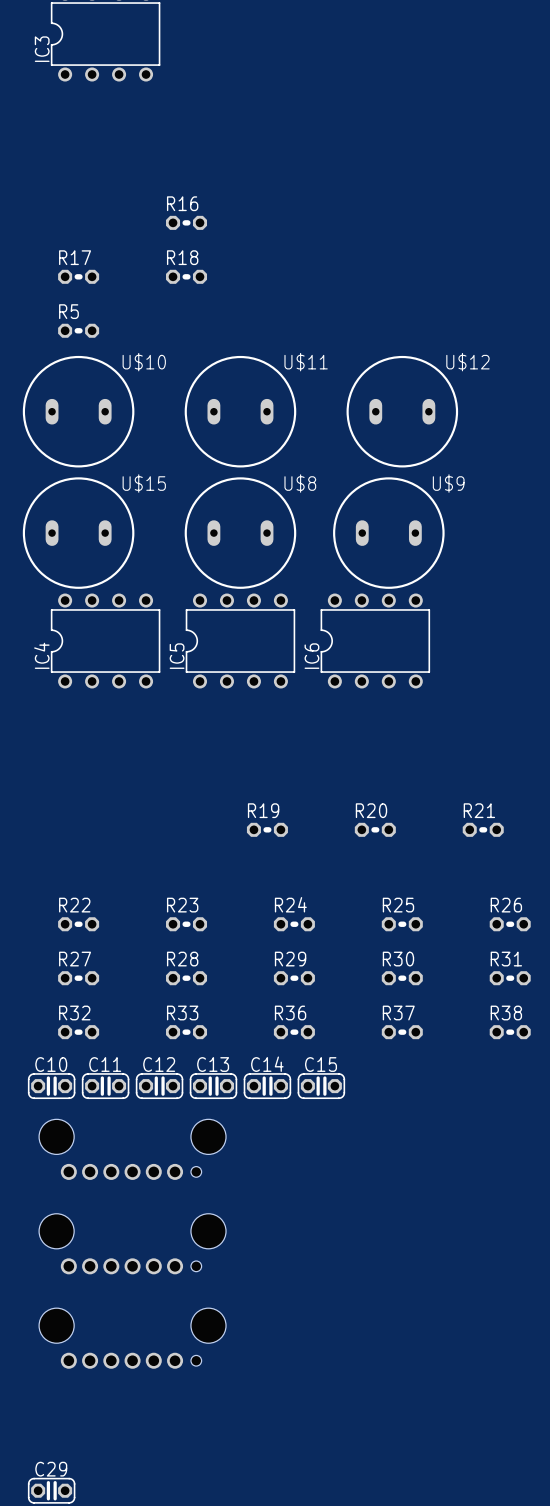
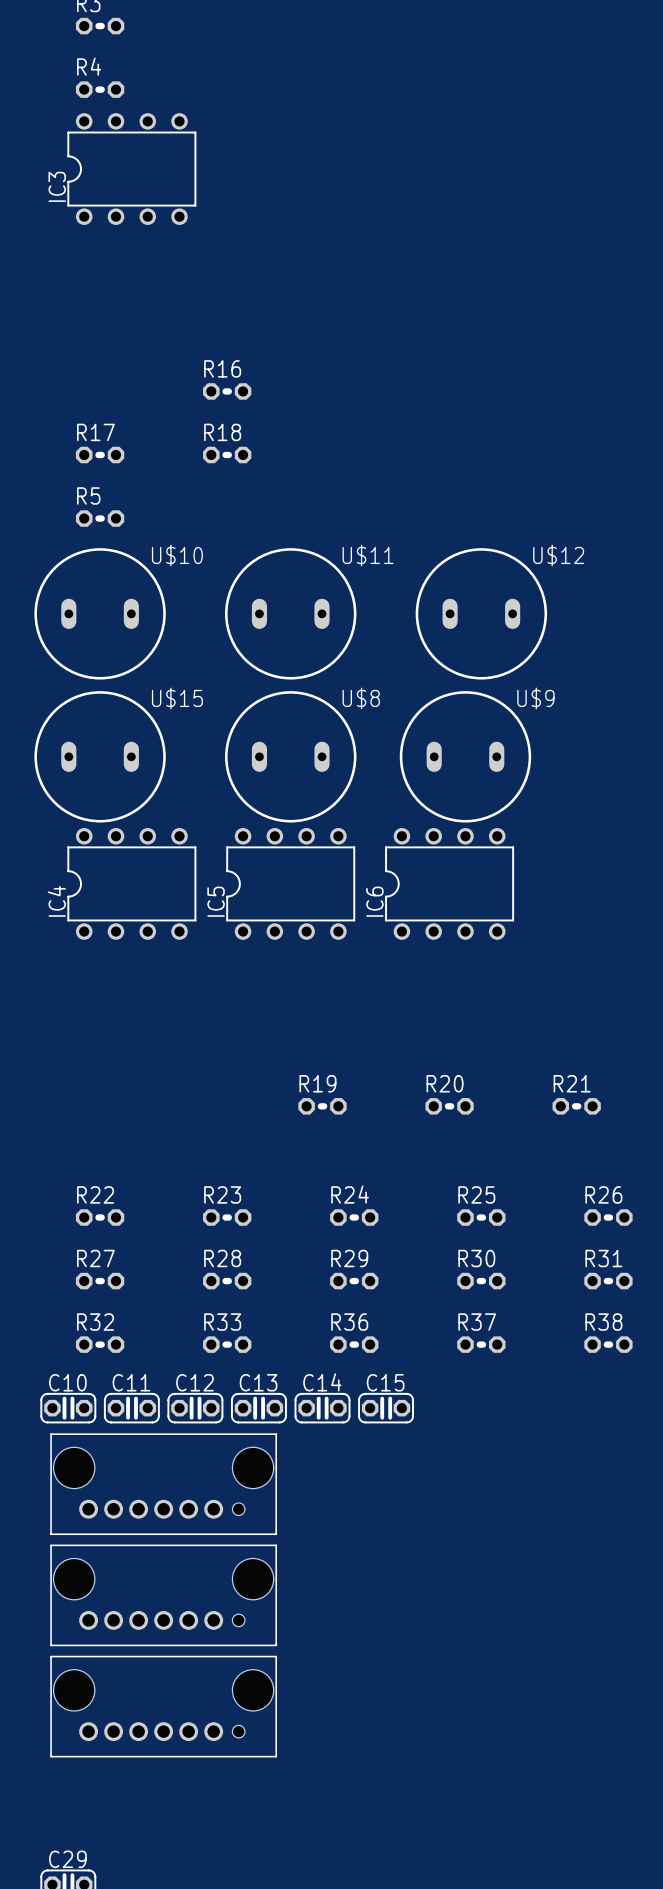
part footprint: [39, 1119, 227, 1180] -> [50, 1433, 278, 1536]
part footprint: [39, 1213, 227, 1275] -> [50, 1544, 278, 1647]
part footprint: [39, 1308, 227, 1369] -> [50, 1655, 278, 1758]

